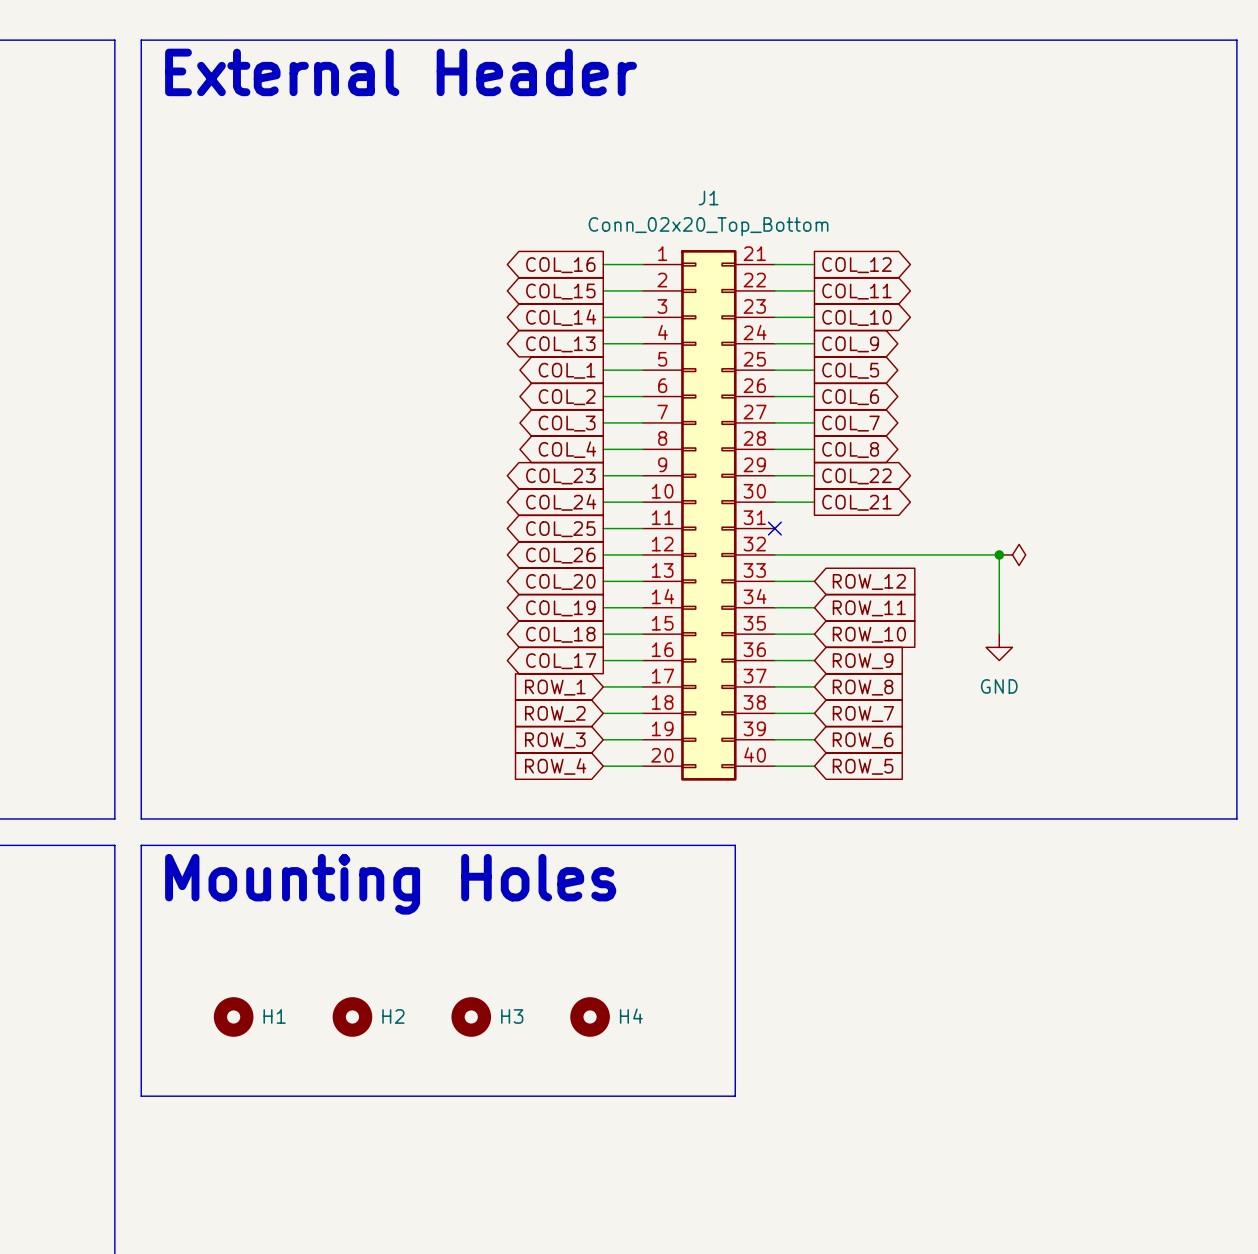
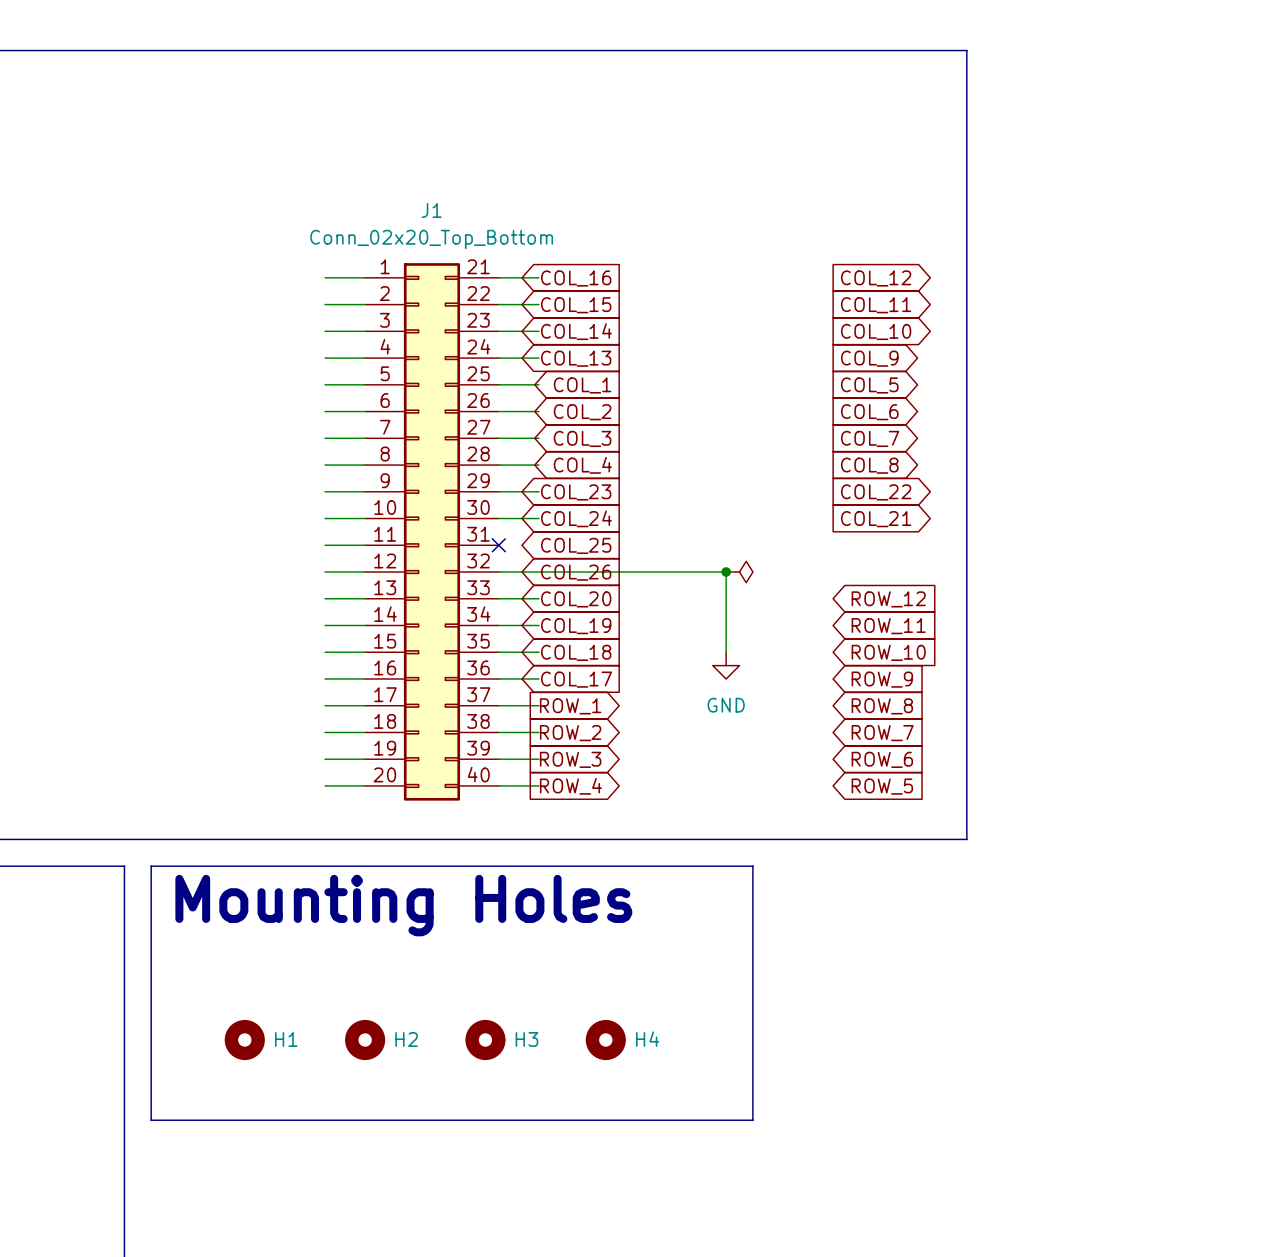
line: (114, 40) (114, 818) -> (124, 50) (151, 50)
line: (141, 40) (141, 818) -> (124, 839) (151, 839)
line: (946, 40) (1236, 40) (1236, 818) (946, 818) -> (966, 50) (966, 839)
text: External Header (401, 72) -> none
wire: none -> (325, 277) (365, 277)
wire: (603, 264) (642, 264) -> (498, 277) (538, 277)
wire: (774, 264) (814, 264) -> none
wire: none -> (325, 304) (365, 304)
wire: (603, 290) (642, 290) -> (498, 304) (538, 304)
wire: (774, 290) (814, 290) -> none
wire: none -> (325, 331) (365, 331)
wire: (603, 317) (642, 317) -> (498, 331) (538, 331)
wire: (774, 317) (814, 317) -> none
wire: none -> (325, 358) (365, 358)
wire: (603, 343) (642, 343) -> (498, 358) (538, 358)
wire: (774, 343) (814, 343) -> none
wire: none -> (325, 384) (365, 384)
wire: (603, 370) (642, 370) -> (498, 384) (538, 384)
wire: (774, 370) (814, 370) -> none
wire: none -> (325, 411) (365, 411)
wire: (603, 396) (642, 396) -> (498, 411) (538, 411)
wire: (774, 396) (814, 396) -> none
wire: none -> (325, 438) (365, 438)
wire: (603, 422) (642, 422) -> (498, 438) (538, 438)
wire: (774, 422) (814, 422) -> none
wire: none -> (325, 465) (365, 465)
wire: (603, 449) (642, 449) -> (498, 465) (538, 465)
wire: (774, 449) (814, 449) -> none
wire: none -> (325, 491) (365, 491)
wire: (603, 475) (642, 475) -> (498, 491) (538, 491)
wire: (774, 475) (814, 475) -> none
wire: none -> (325, 518) (365, 518)
wire: (603, 502) (642, 502) -> (498, 518) (538, 518)
wire: (774, 502) (814, 502) -> none
J1 position: (708, 515) -> (431, 531)
wire: none -> (325, 545) (365, 545)
no-connect mark: none -> (498, 545)
wire: (603, 528) (642, 528) -> none
no-connect mark: (774, 528) -> none
wire: none -> (325, 572) (365, 572)
wire: none -> (498, 572) (619, 572)
junction: none -> (726, 572)
power symbol: none -> (739, 572)
wire: (774, 554) (999, 554) (999, 634) -> none
junction: (999, 554) -> none
power symbol: (1012, 554) -> none
wire: none -> (325, 598) (365, 598)
wire: (603, 581) (642, 581) -> (498, 598) (538, 598)
wire: (774, 581) (814, 581) -> none
wire: none -> (325, 625) (365, 625)
wire: (603, 607) (642, 607) -> (498, 625) (538, 625)
wire: (774, 607) (814, 607) -> none
wire: none -> (325, 652) (365, 652)
wire: (603, 634) (642, 634) -> (498, 652) (538, 652)
wire: (774, 634) (814, 634) -> none
power symbol: none -> GND (726, 665)
power symbol: GND (999, 647) -> none
wire: none -> (325, 678) (365, 678)
wire: (603, 660) (642, 660) -> (498, 678) (538, 678)
wire: (774, 660) (814, 660) -> none
wire: none -> (325, 705) (365, 705)
wire: (603, 686) (642, 686) -> (498, 705) (538, 705)
wire: (774, 686) (814, 686) -> none
wire: none -> (325, 732) (365, 732)
wire: (603, 713) (642, 713) -> (498, 732) (538, 732)
wire: (774, 713) (814, 713) -> none
wire: none -> (325, 759) (365, 759)
wire: (603, 739) (642, 739) -> (498, 759) (538, 759)
wire: (774, 739) (814, 739) -> none
wire: none -> (325, 785) (365, 785)
wire: (603, 766) (642, 766) -> (498, 785) (538, 785)
wire: (774, 766) (814, 766) -> none

